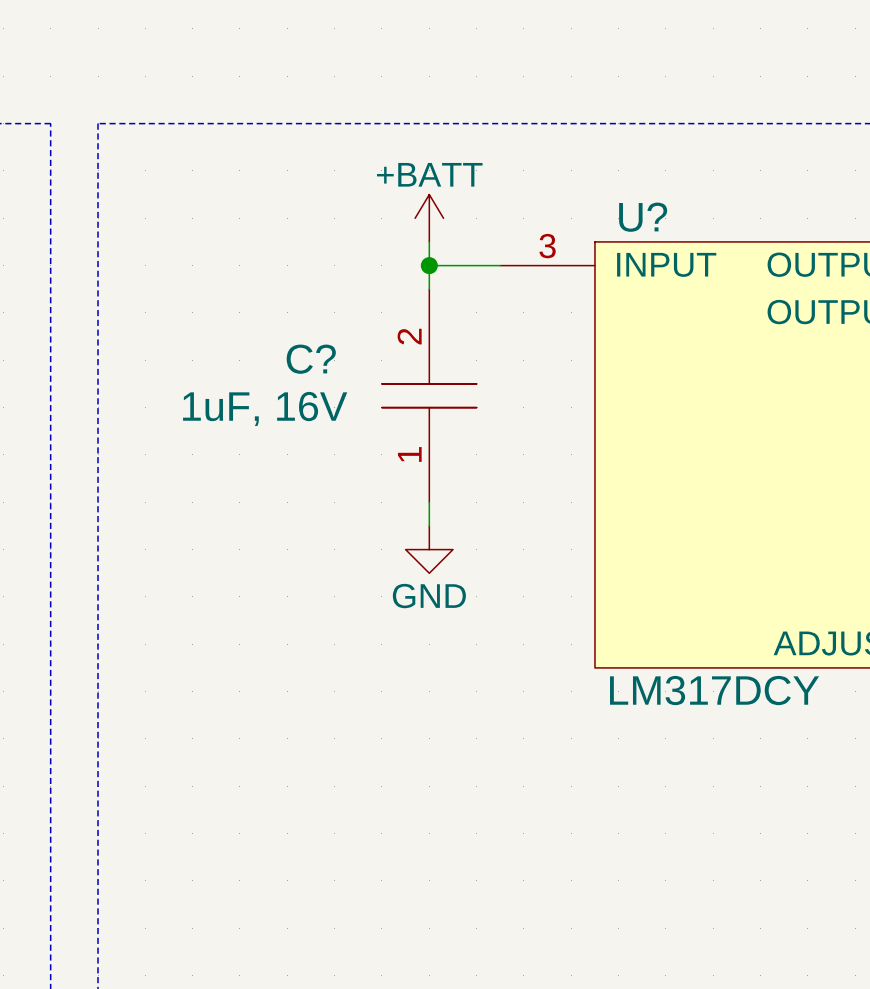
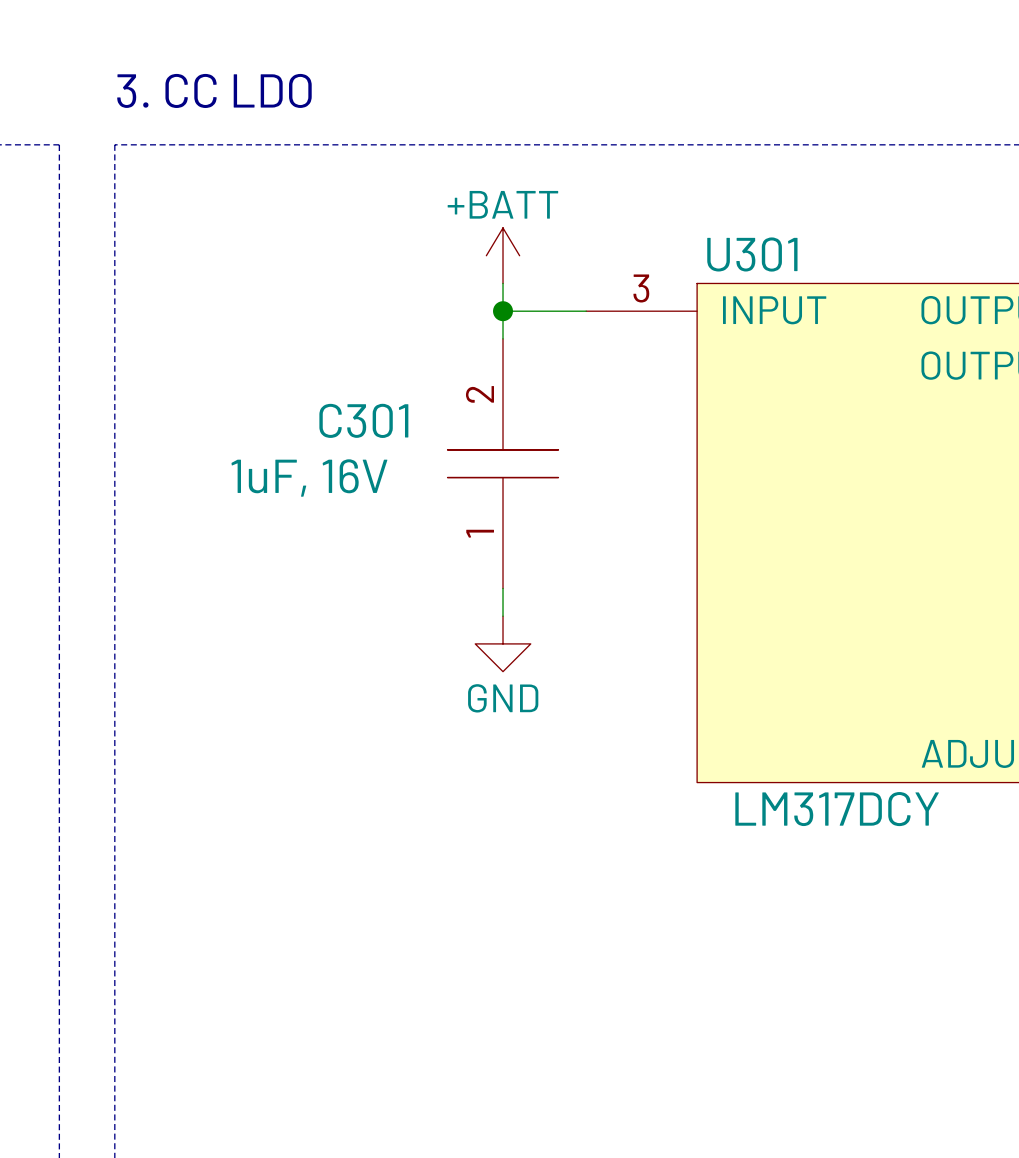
text: none -> 3. CC LDO (214, 90)
U? name: U? (643, 217) -> U301 (752, 254)
C? name: C? (311, 359) -> C301 (363, 420)

